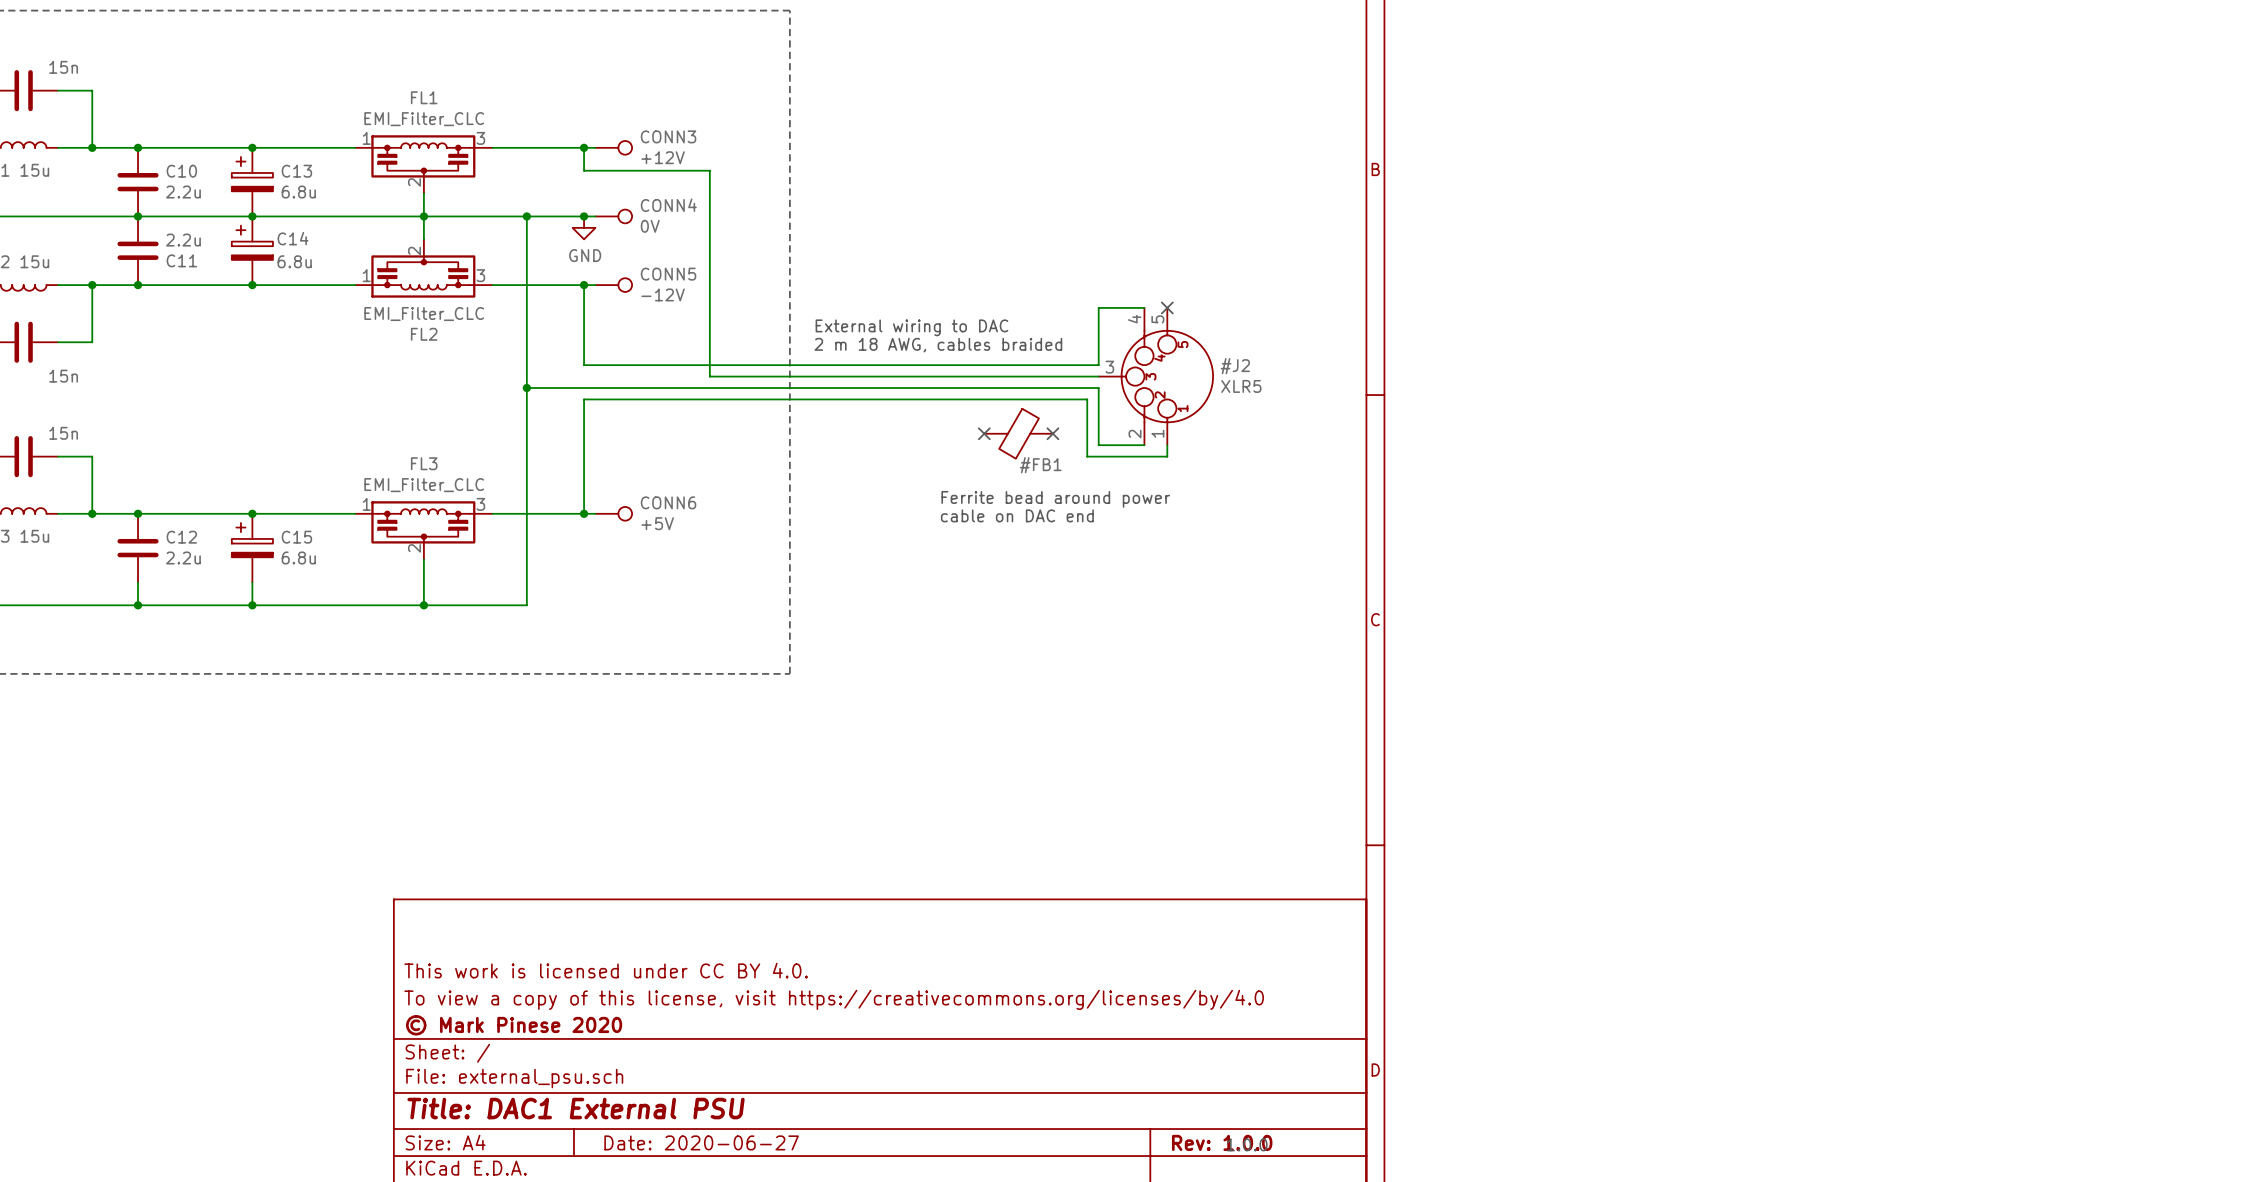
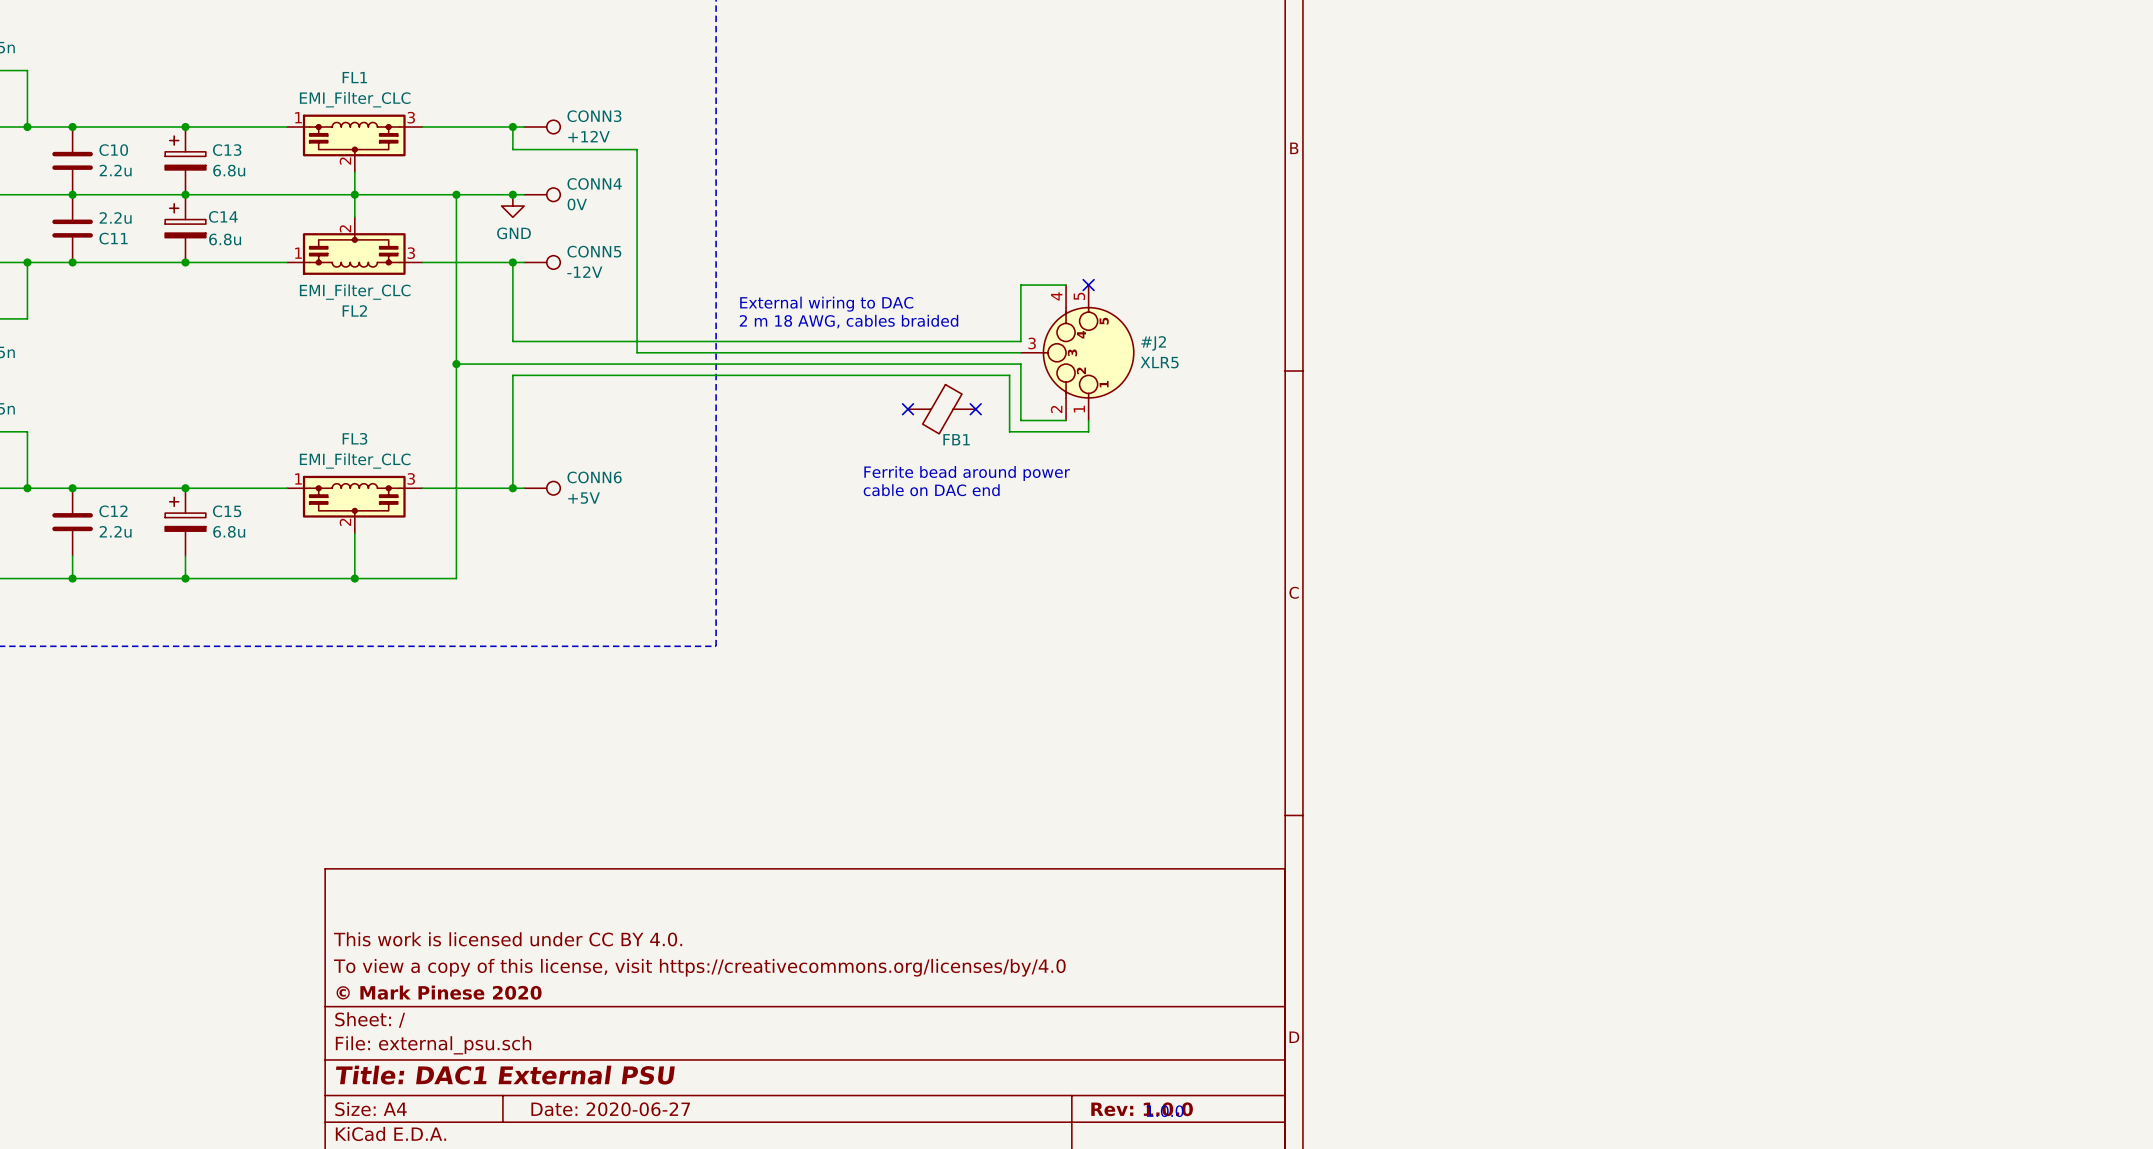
#FB1: (1018, 433) -> none
FB1: none -> (941, 409)

